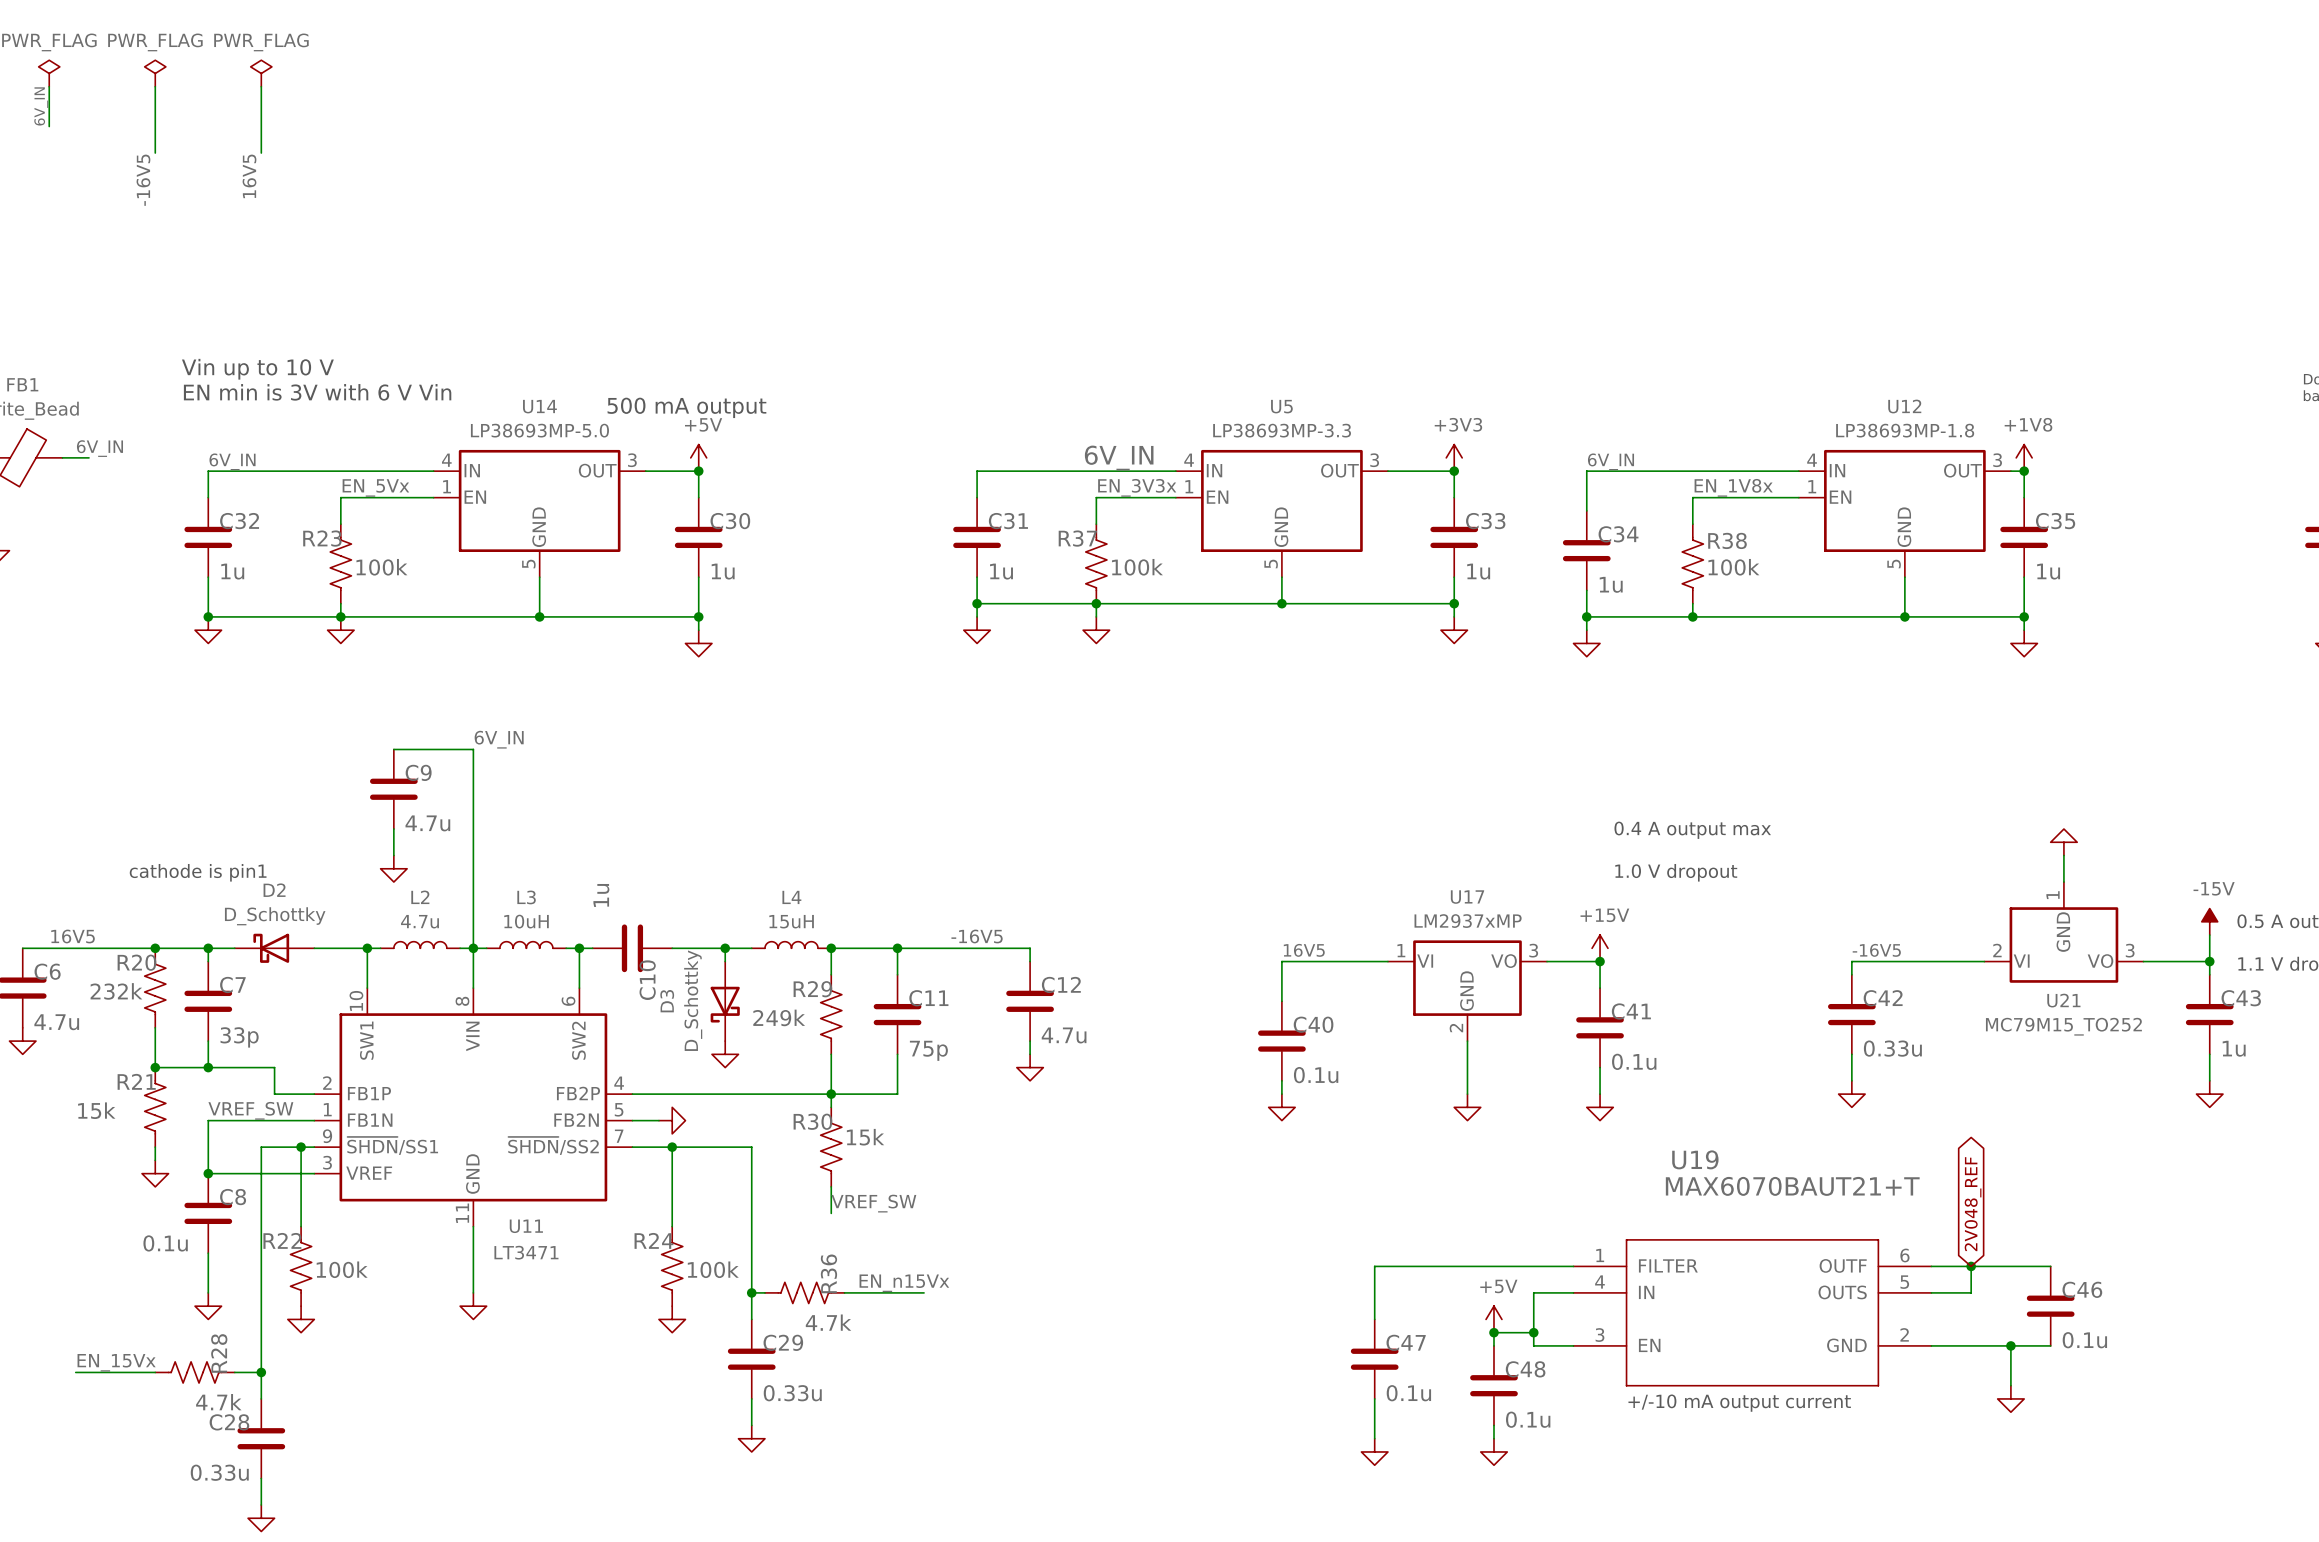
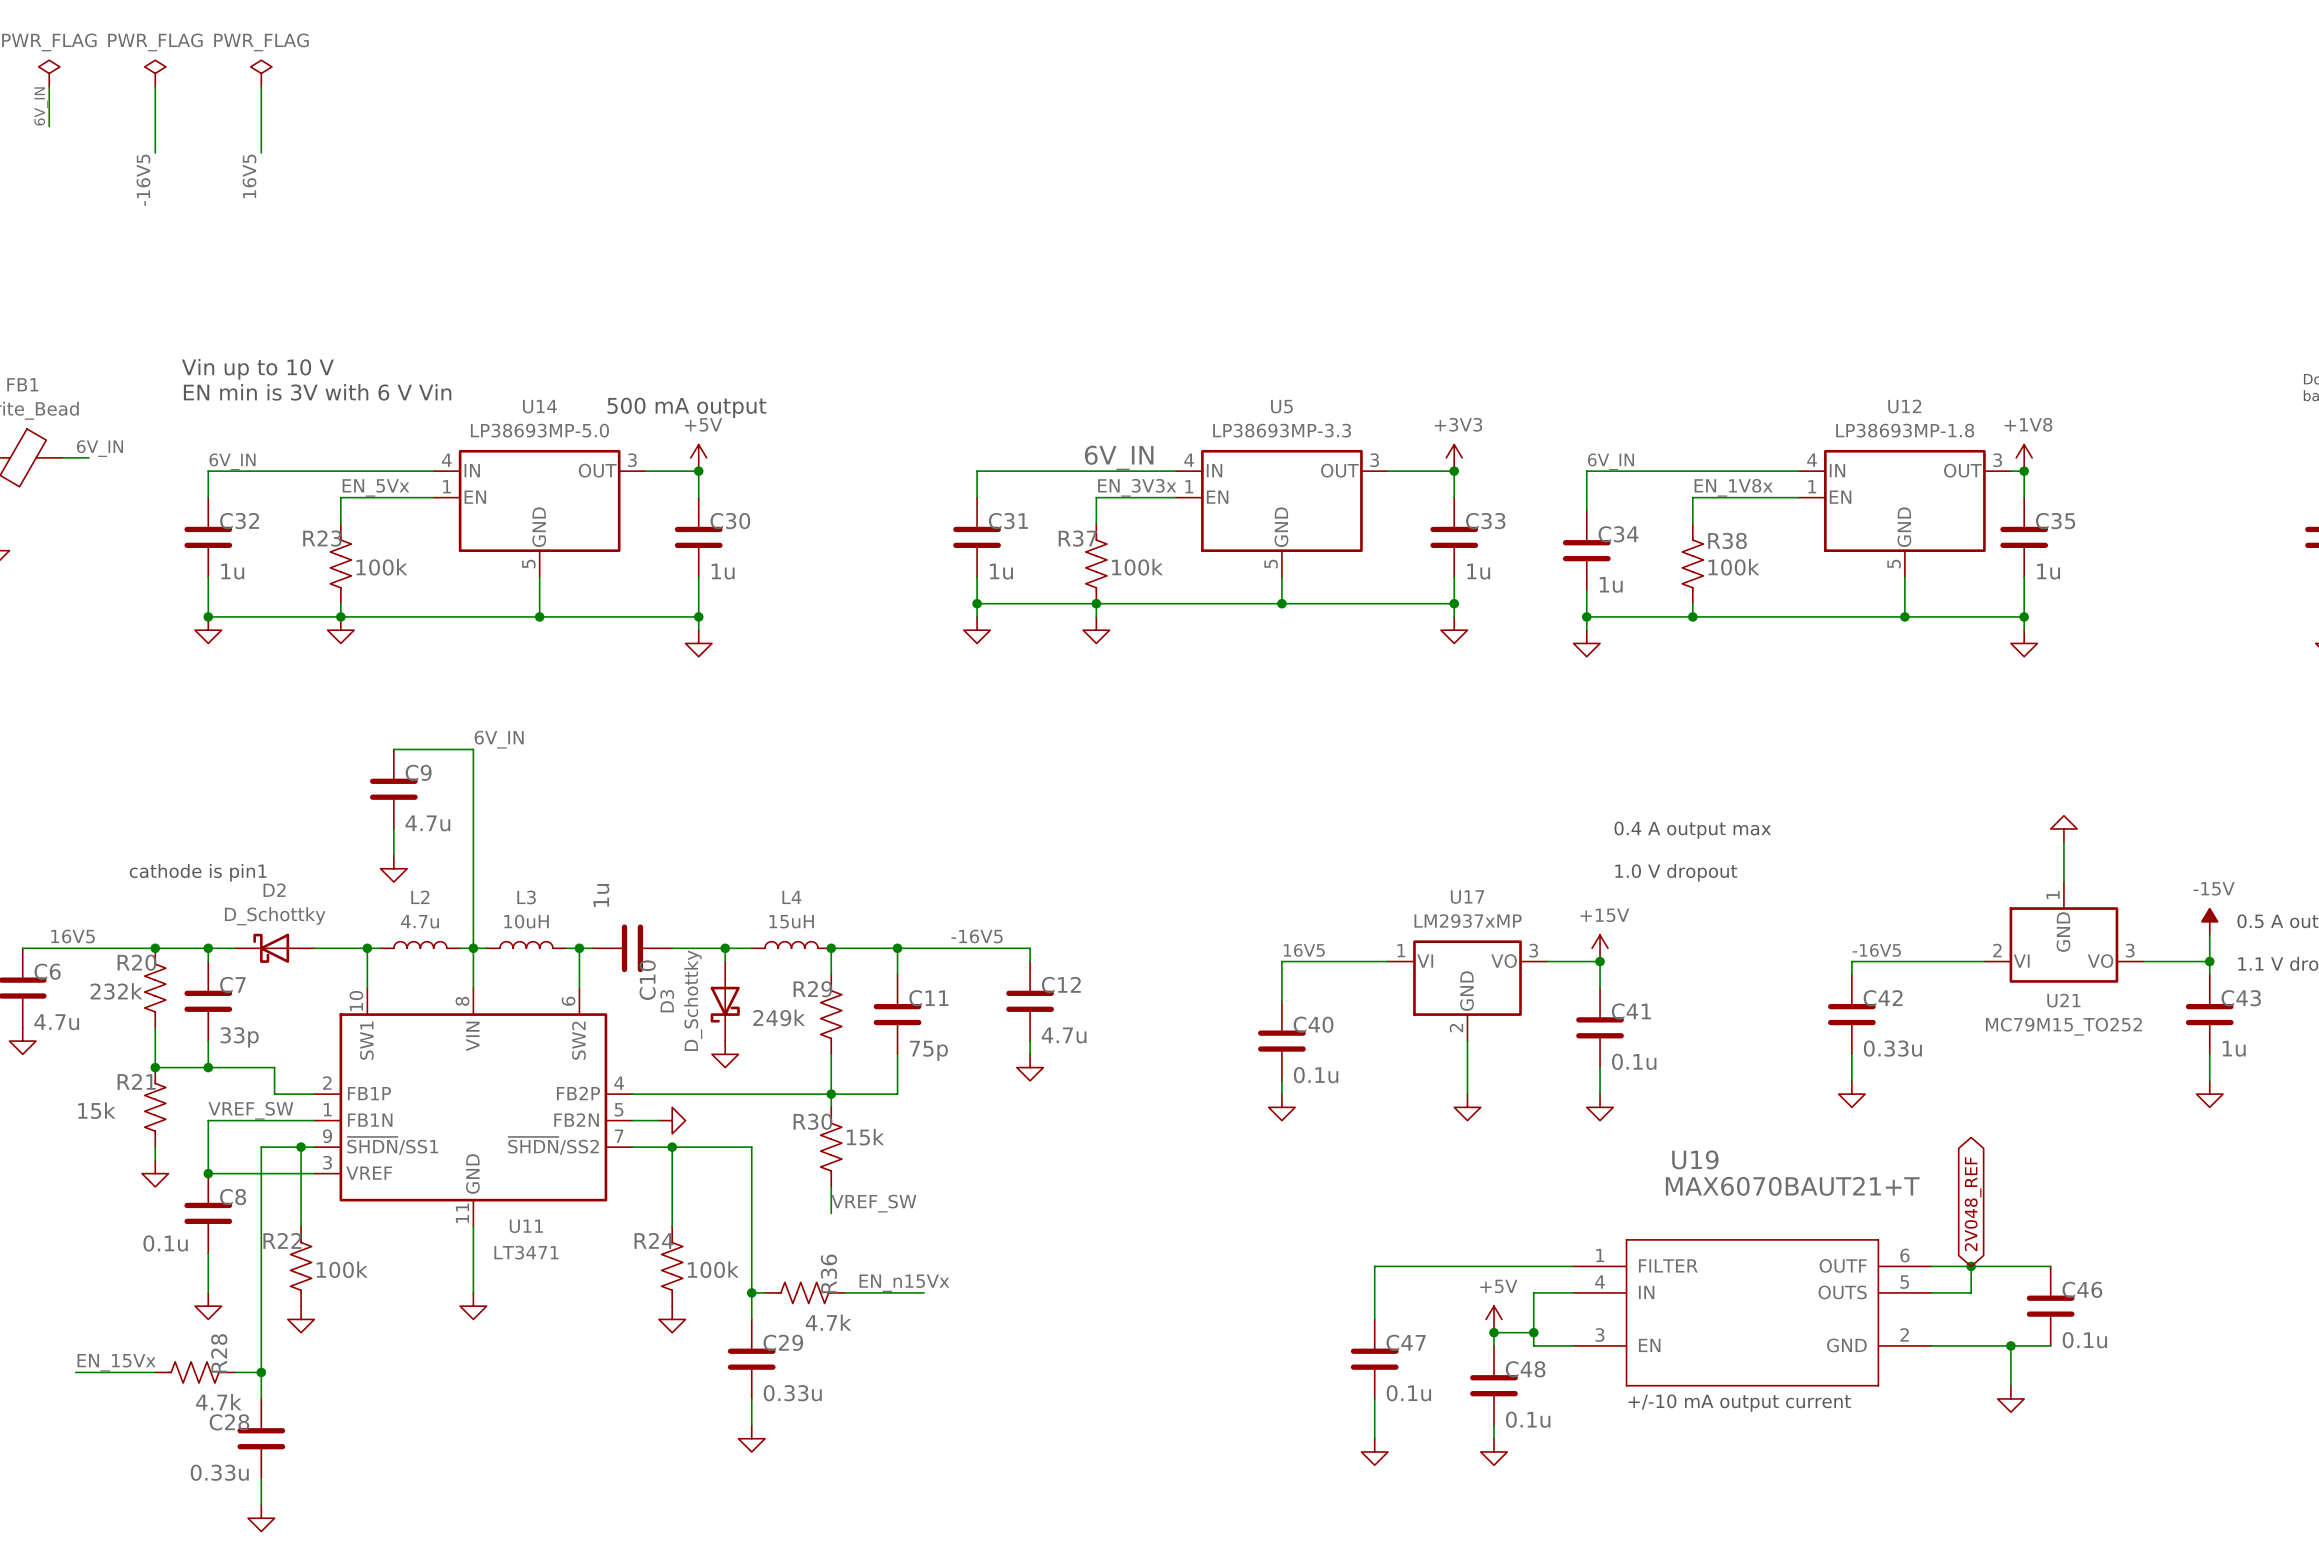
power symbol position: (2063, 842) -> (2063, 829)

